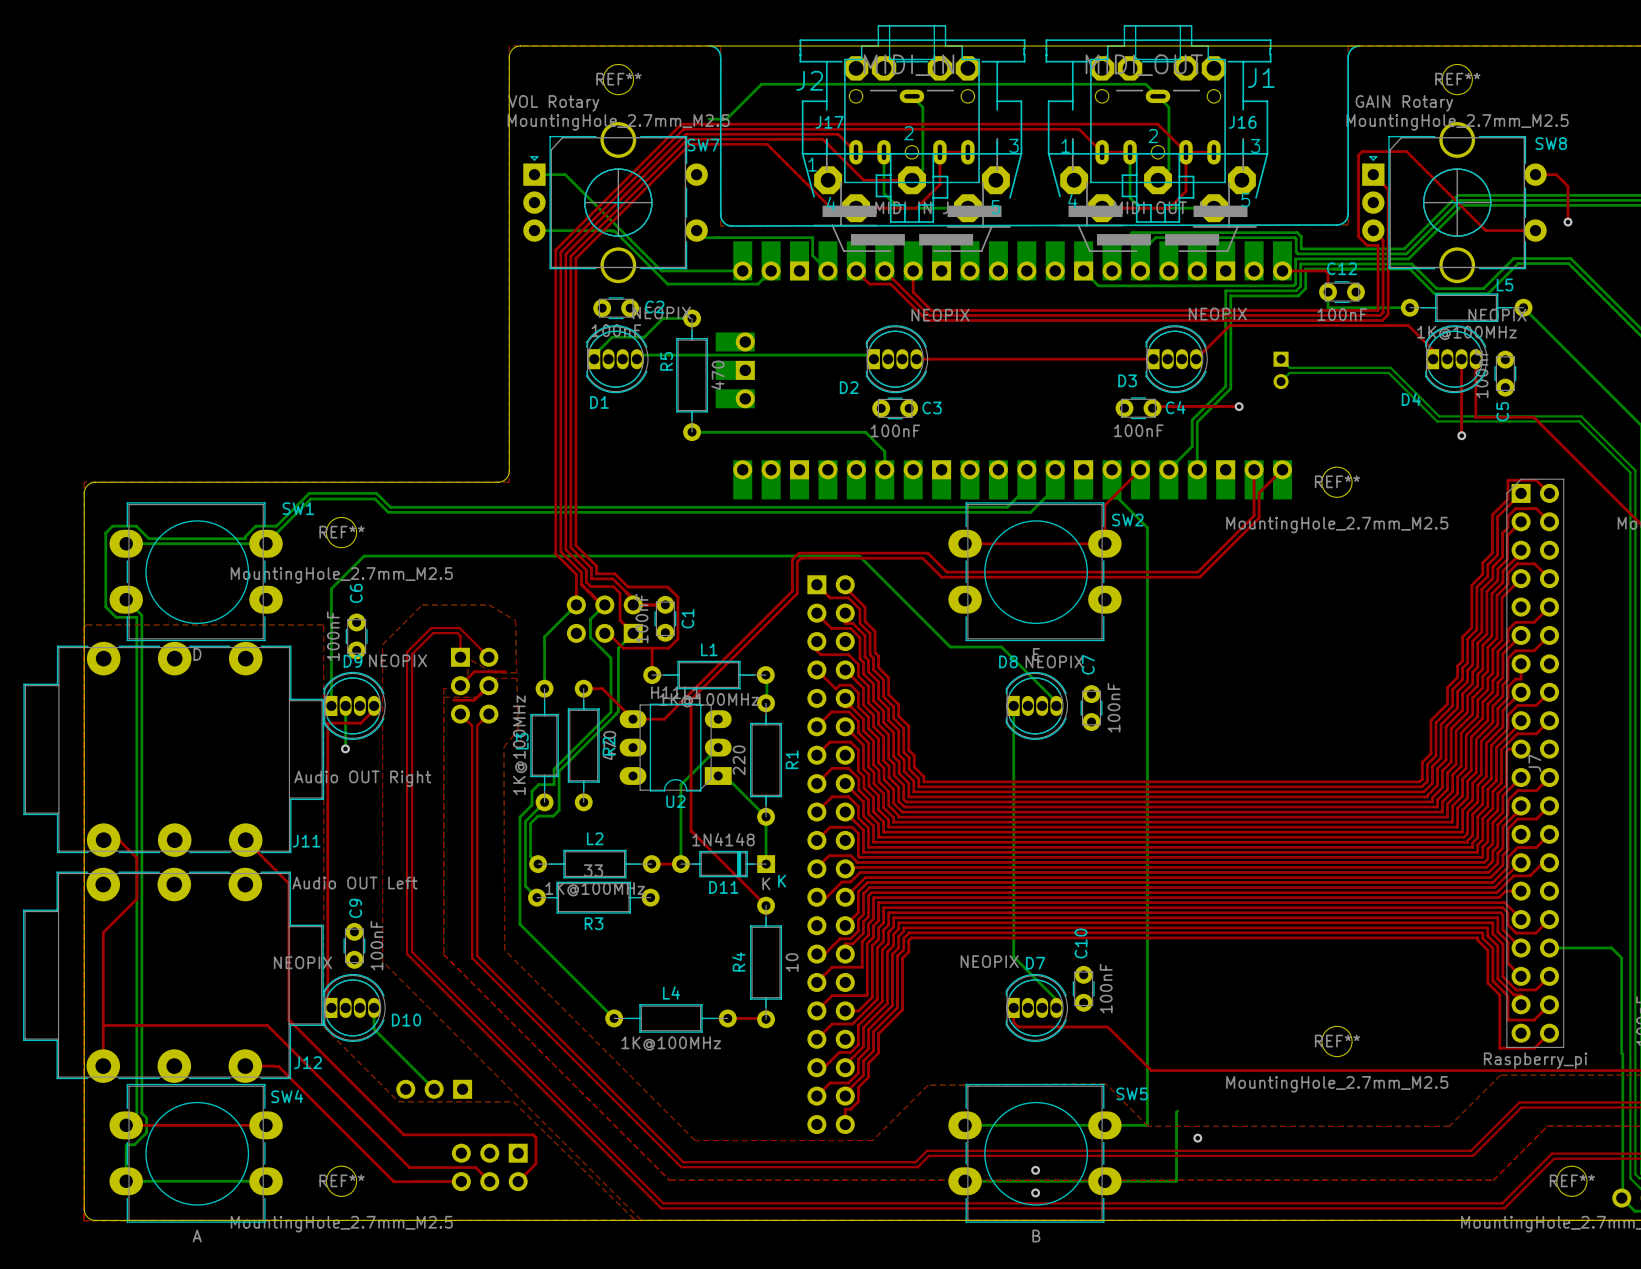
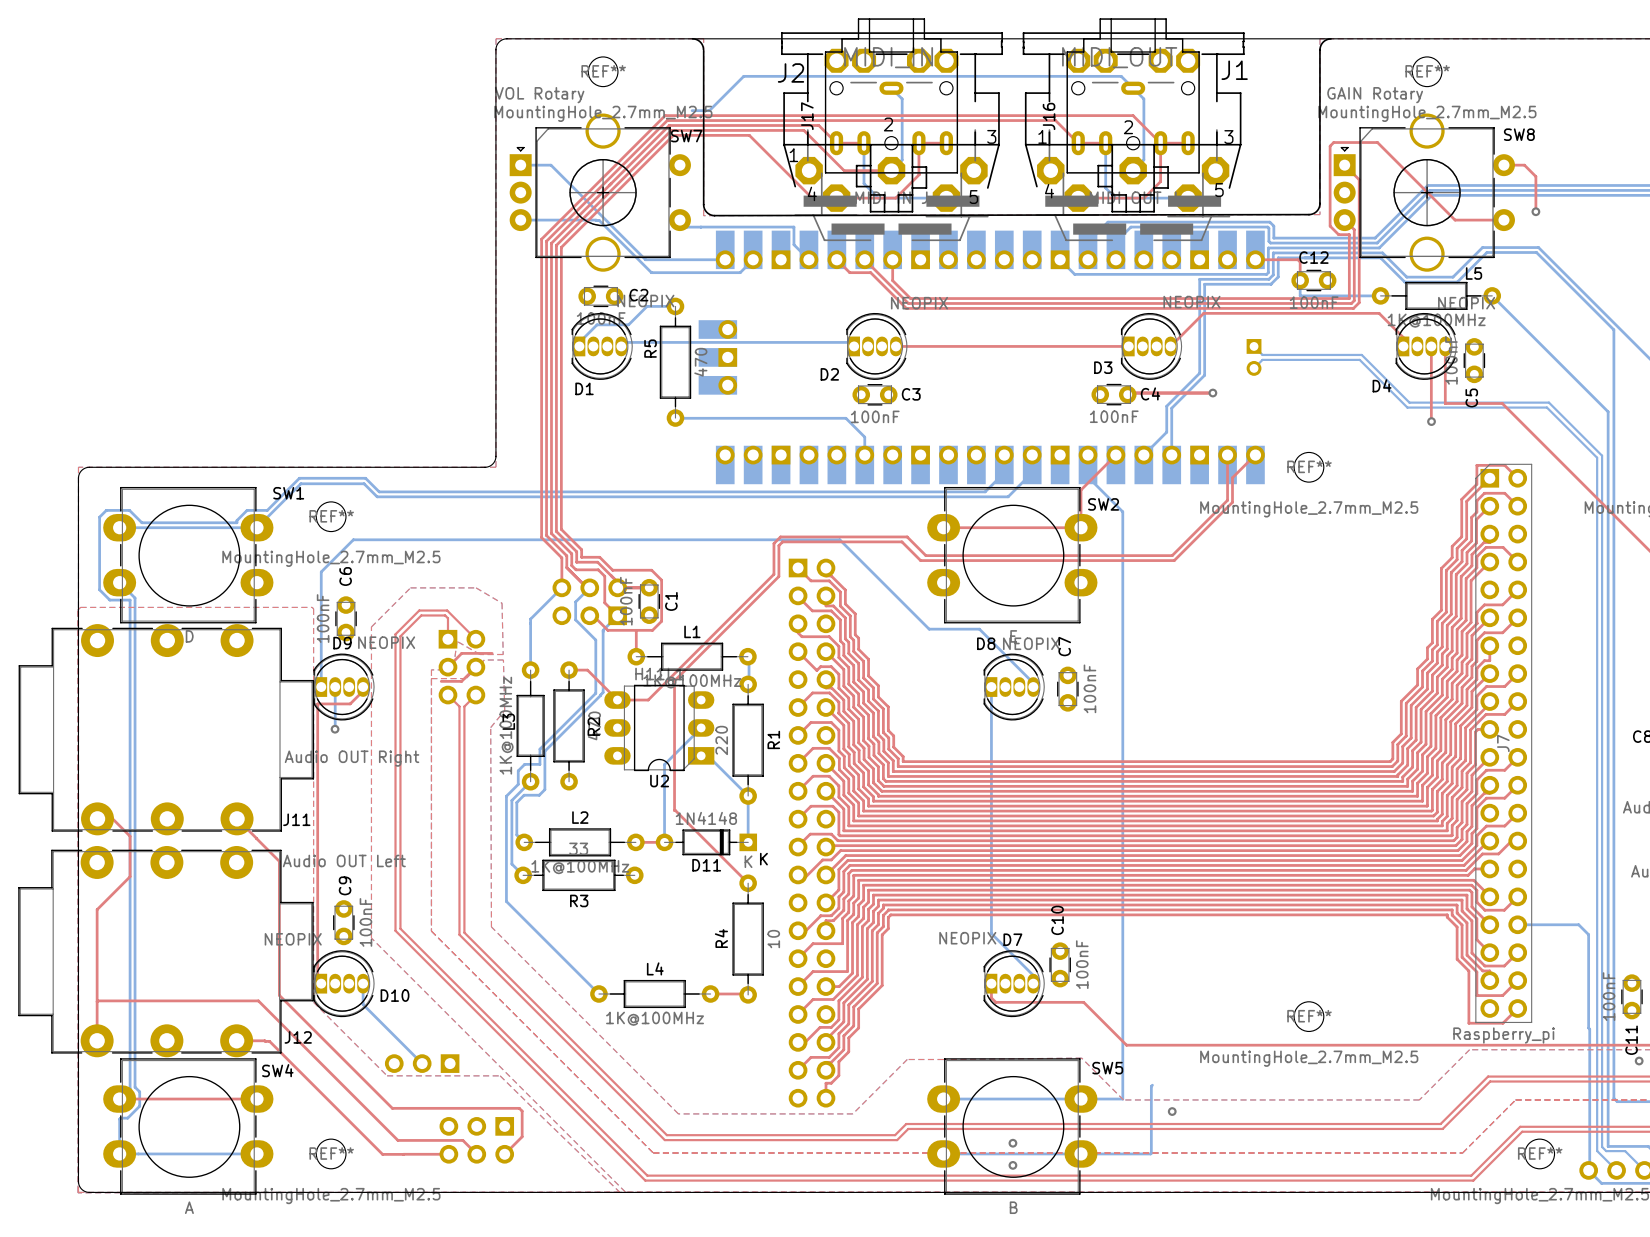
J17 name rotation: 0° (829, 122) -> 90° counterclockwise (807, 116)
J16 name rotation: 0° (1242, 122) -> 90° counterclockwise (1049, 116)
J16 name position: J16 (1242, 122) -> J16 (1049, 116)

